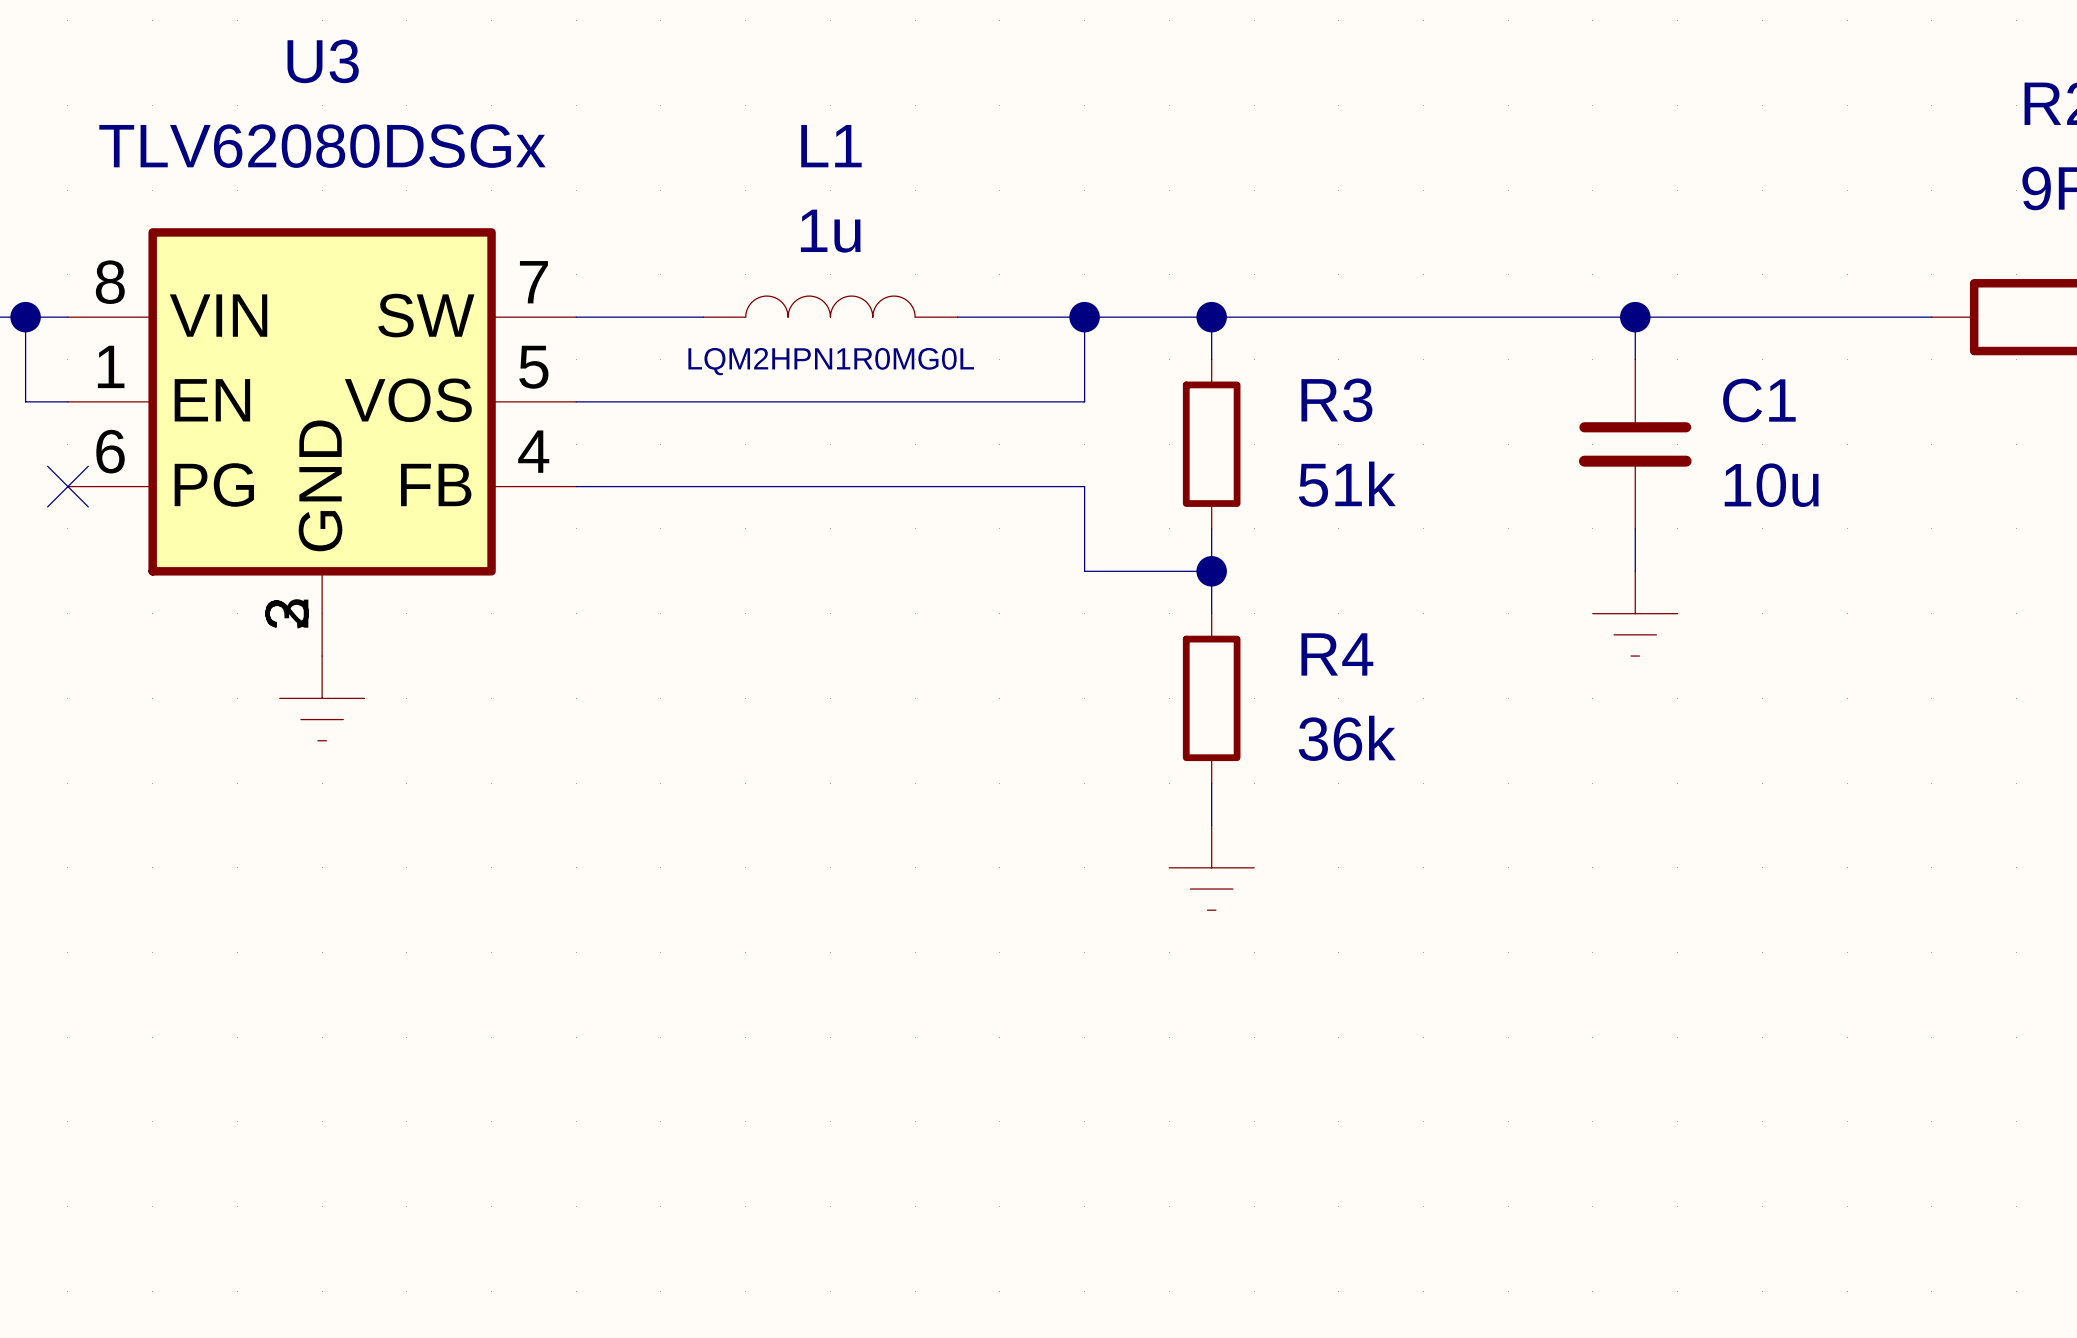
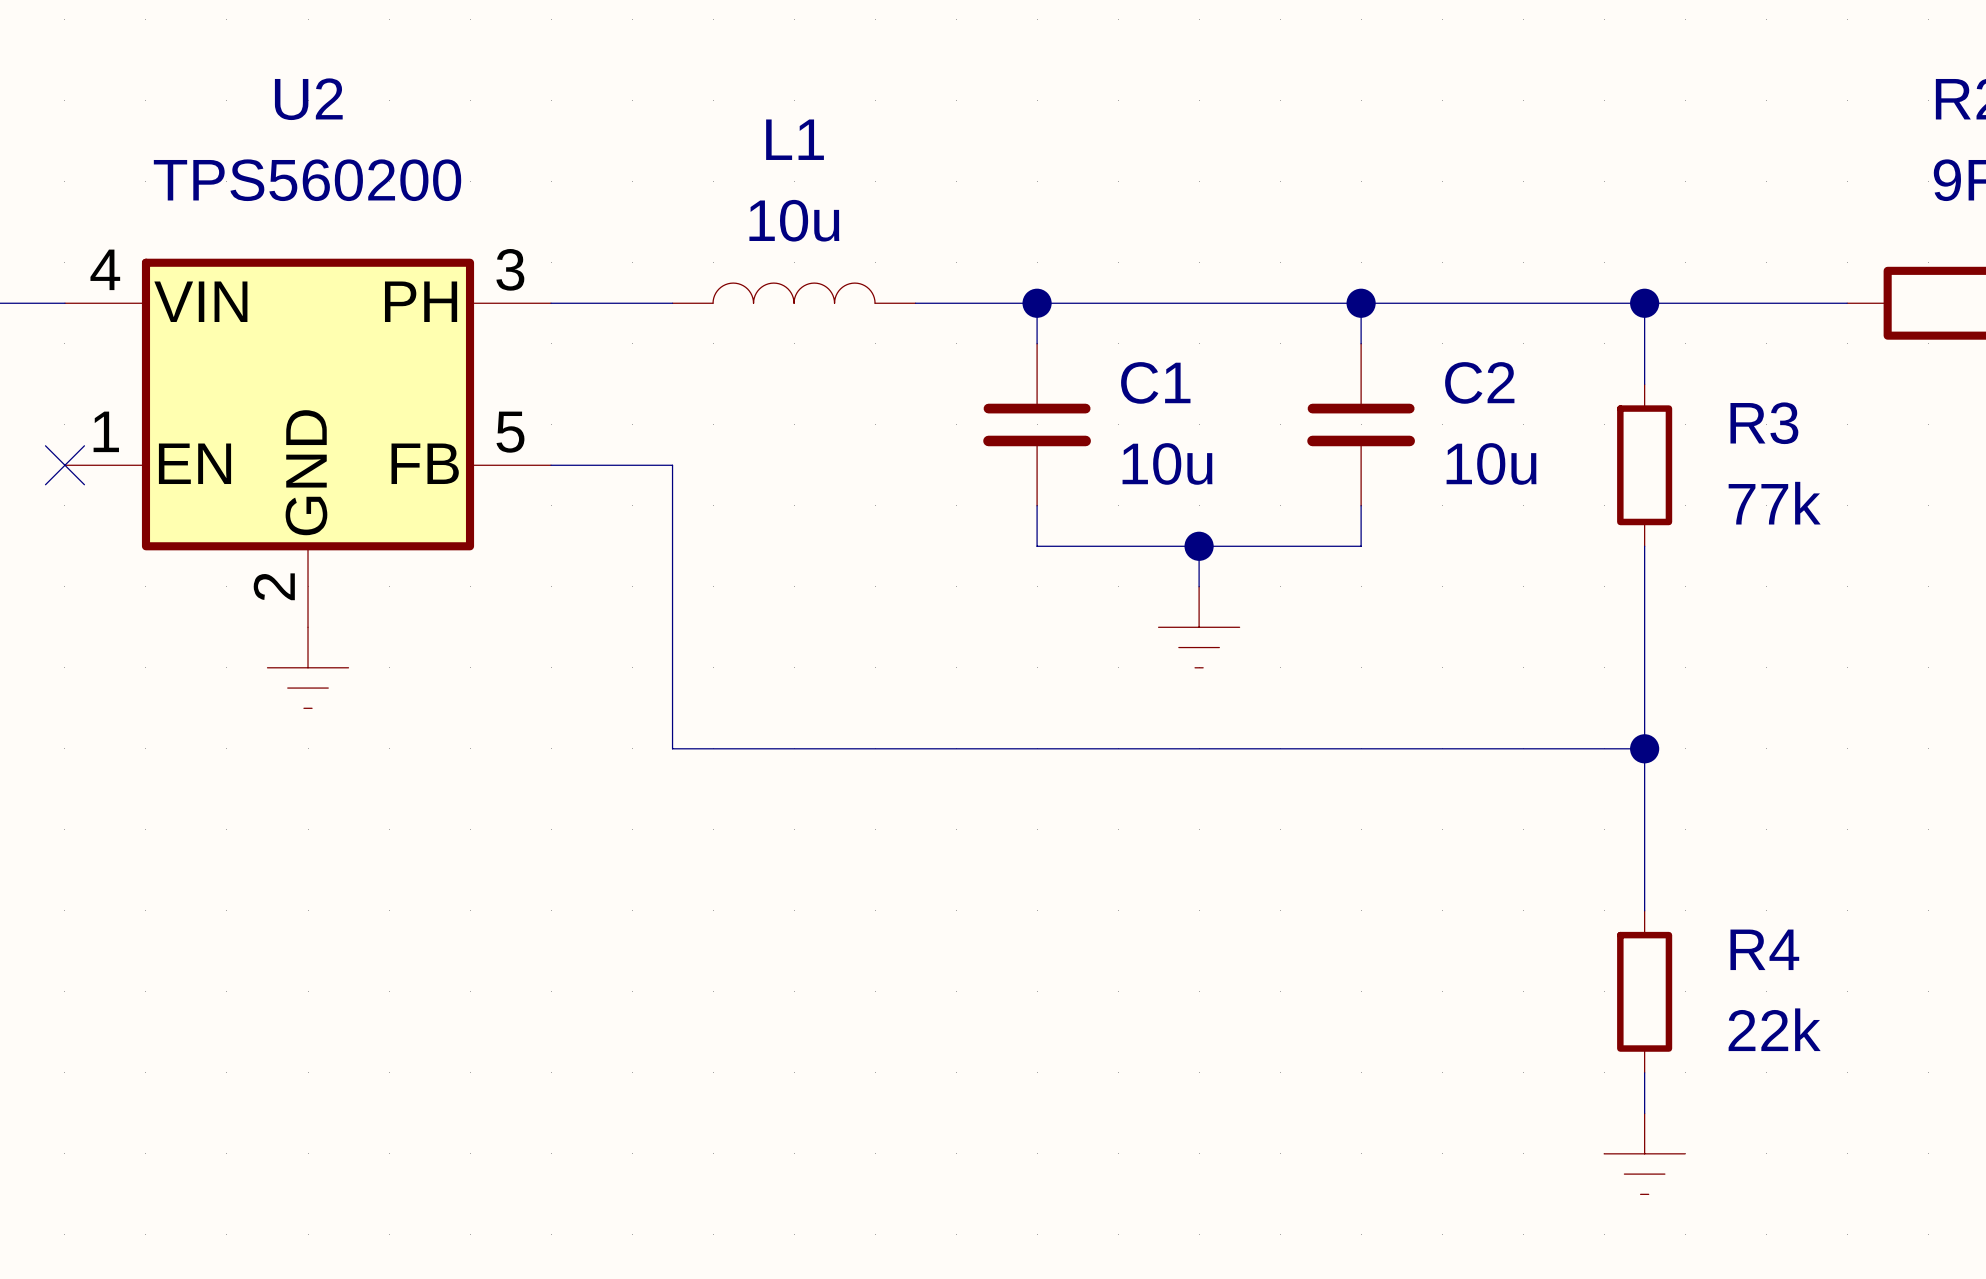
L1 value: 1u (830, 231) -> 10u (794, 220)
wire: (25, 317) (25, 401) (67, 401) -> none
junction: (25, 317) -> none
wire: (1211, 317) (1211, 359) -> (1361, 303) (1361, 343)
junction: (1211, 317) -> none
junction: none -> (1361, 303)
wire: (1635, 317) (1635, 359) -> none
junction position: (1635, 317) -> (1644, 303)
wire: (1084, 359) (1084, 401) (576, 401) -> none
text: LQM2HPN1R0MG0L (831, 361) -> none
U3: TLV62080DSGx (322, 442) -> none
R3 position: (1211, 444) -> (1644, 465)
C2: none -> 10u (1361, 424)
C1 position: (1635, 444) -> (1037, 424)
U2: none -> TPS560200 (308, 442)
R3 value: 51k (1347, 484) -> 77k (1774, 503)
wire: (703, 486) (1084, 486) (1084, 528) -> (672, 465) (672, 748) (1644, 748)
wire: (1211, 528) (1211, 613) -> (1644, 303) (1644, 384)
wire: none -> (1361, 505) (1361, 546) (1158, 546)
wire: (1635, 528) (1635, 571) -> (1644, 1072) (1644, 1113)
junction position: (1211, 571) -> (1199, 546)
wire: none -> (1644, 546) (1644, 910)
power symbol: (1635, 613) -> none
power symbol: none -> (1199, 627)
R4 position: (1211, 698) -> (1644, 991)
R4 value: 36k (1347, 738) -> 22k (1774, 1029)
wire: (1211, 783) (1211, 825) -> (1199, 546) (1199, 586)
junction: none -> (1644, 748)
power symbol: (1211, 867) -> none
power symbol: none -> (1644, 1153)

